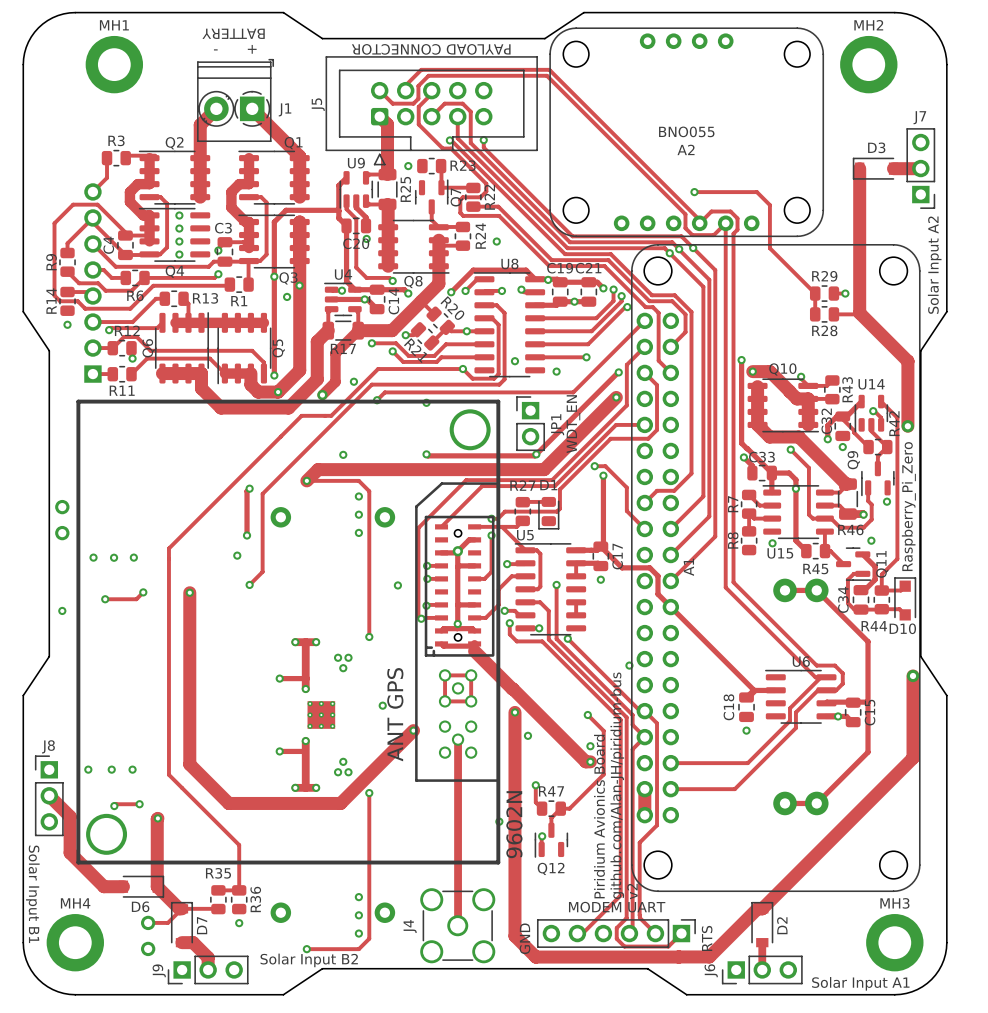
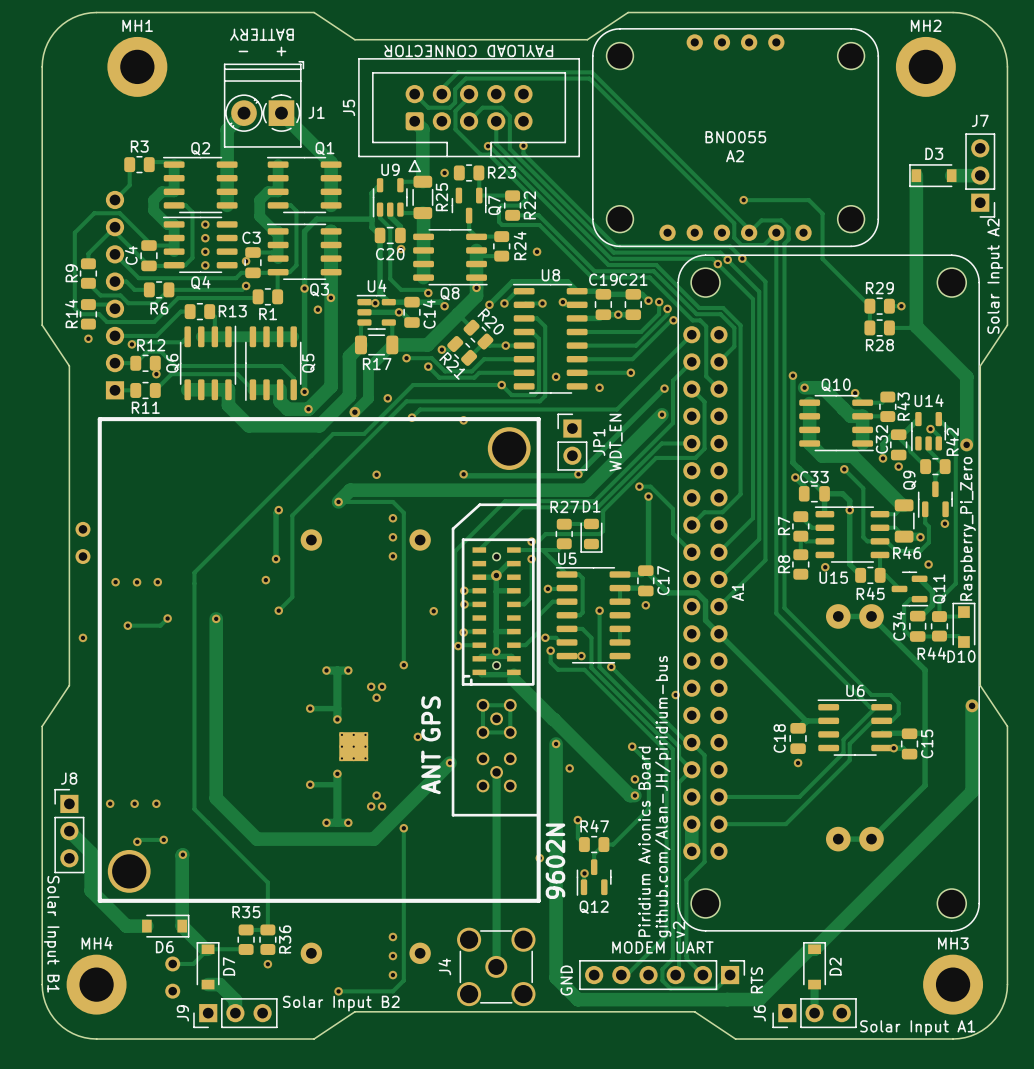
via: none -> (476, 287)
via: (548, 279) -> none

